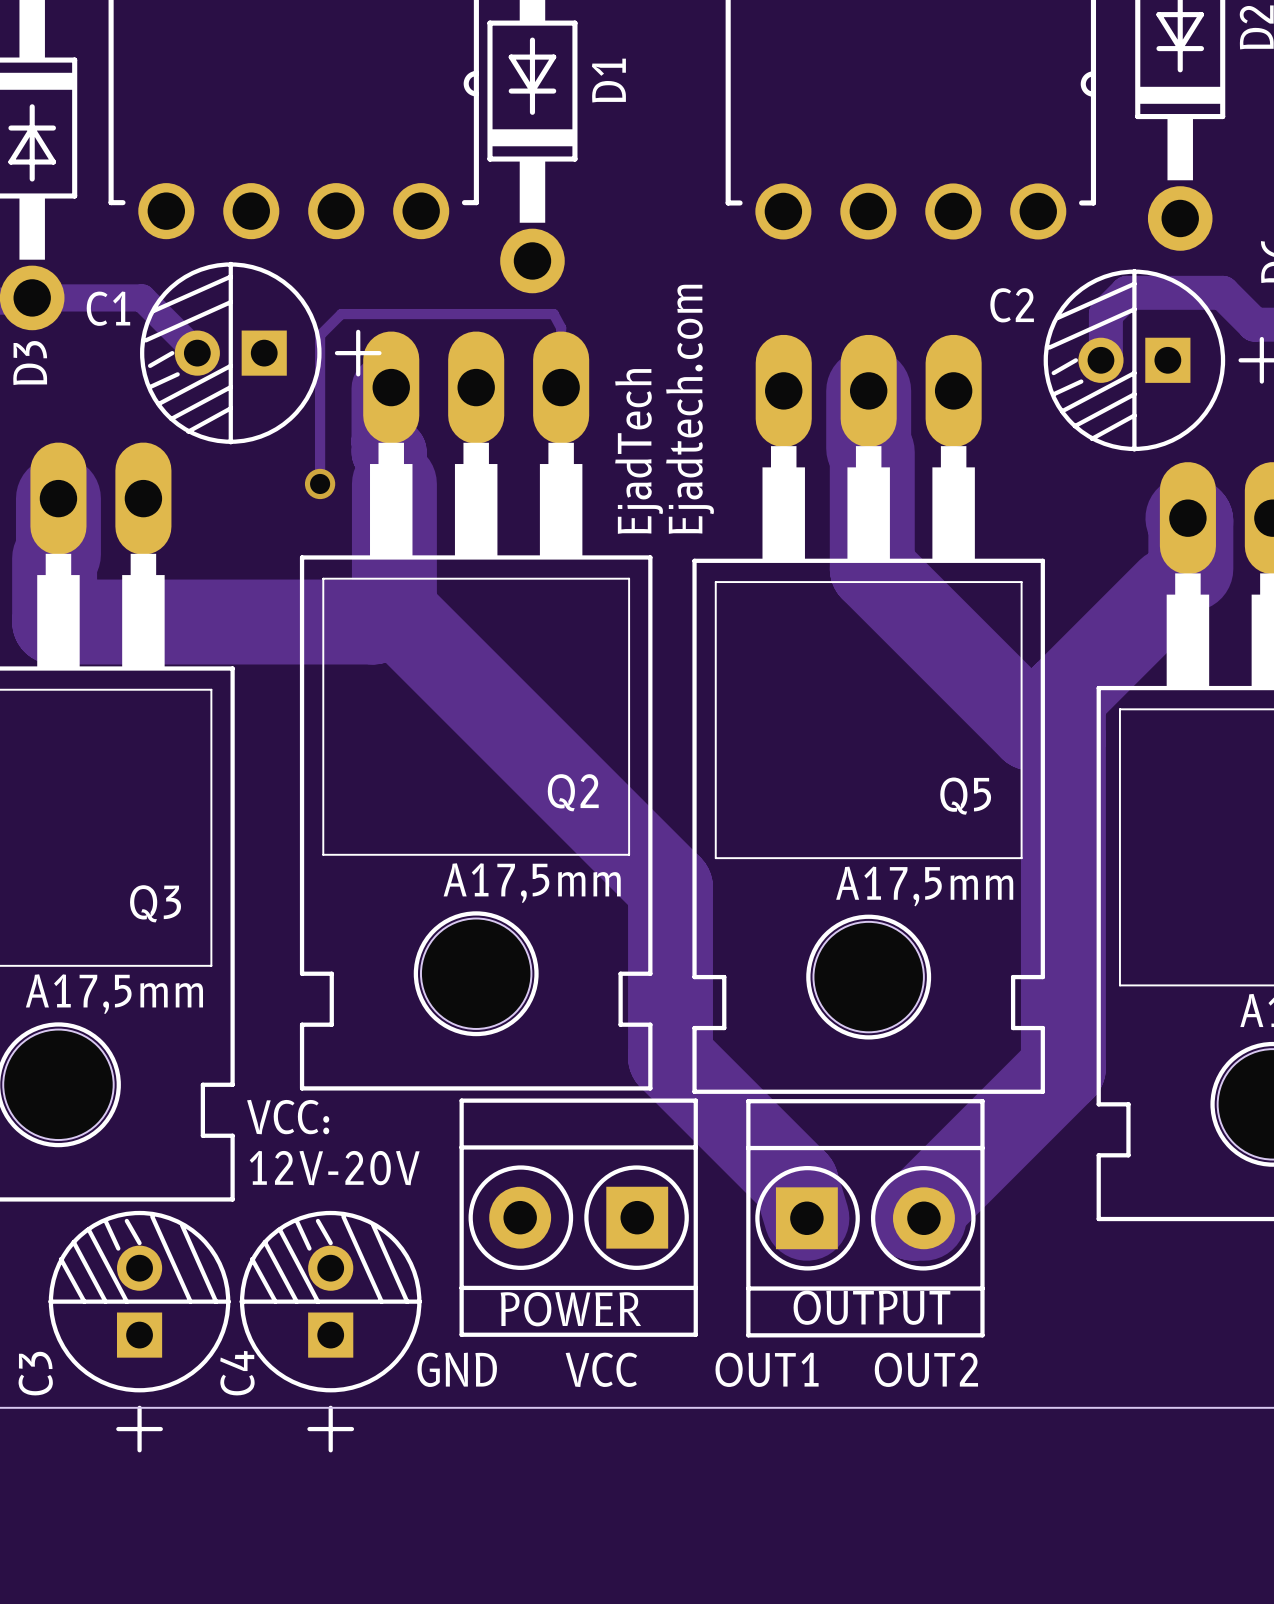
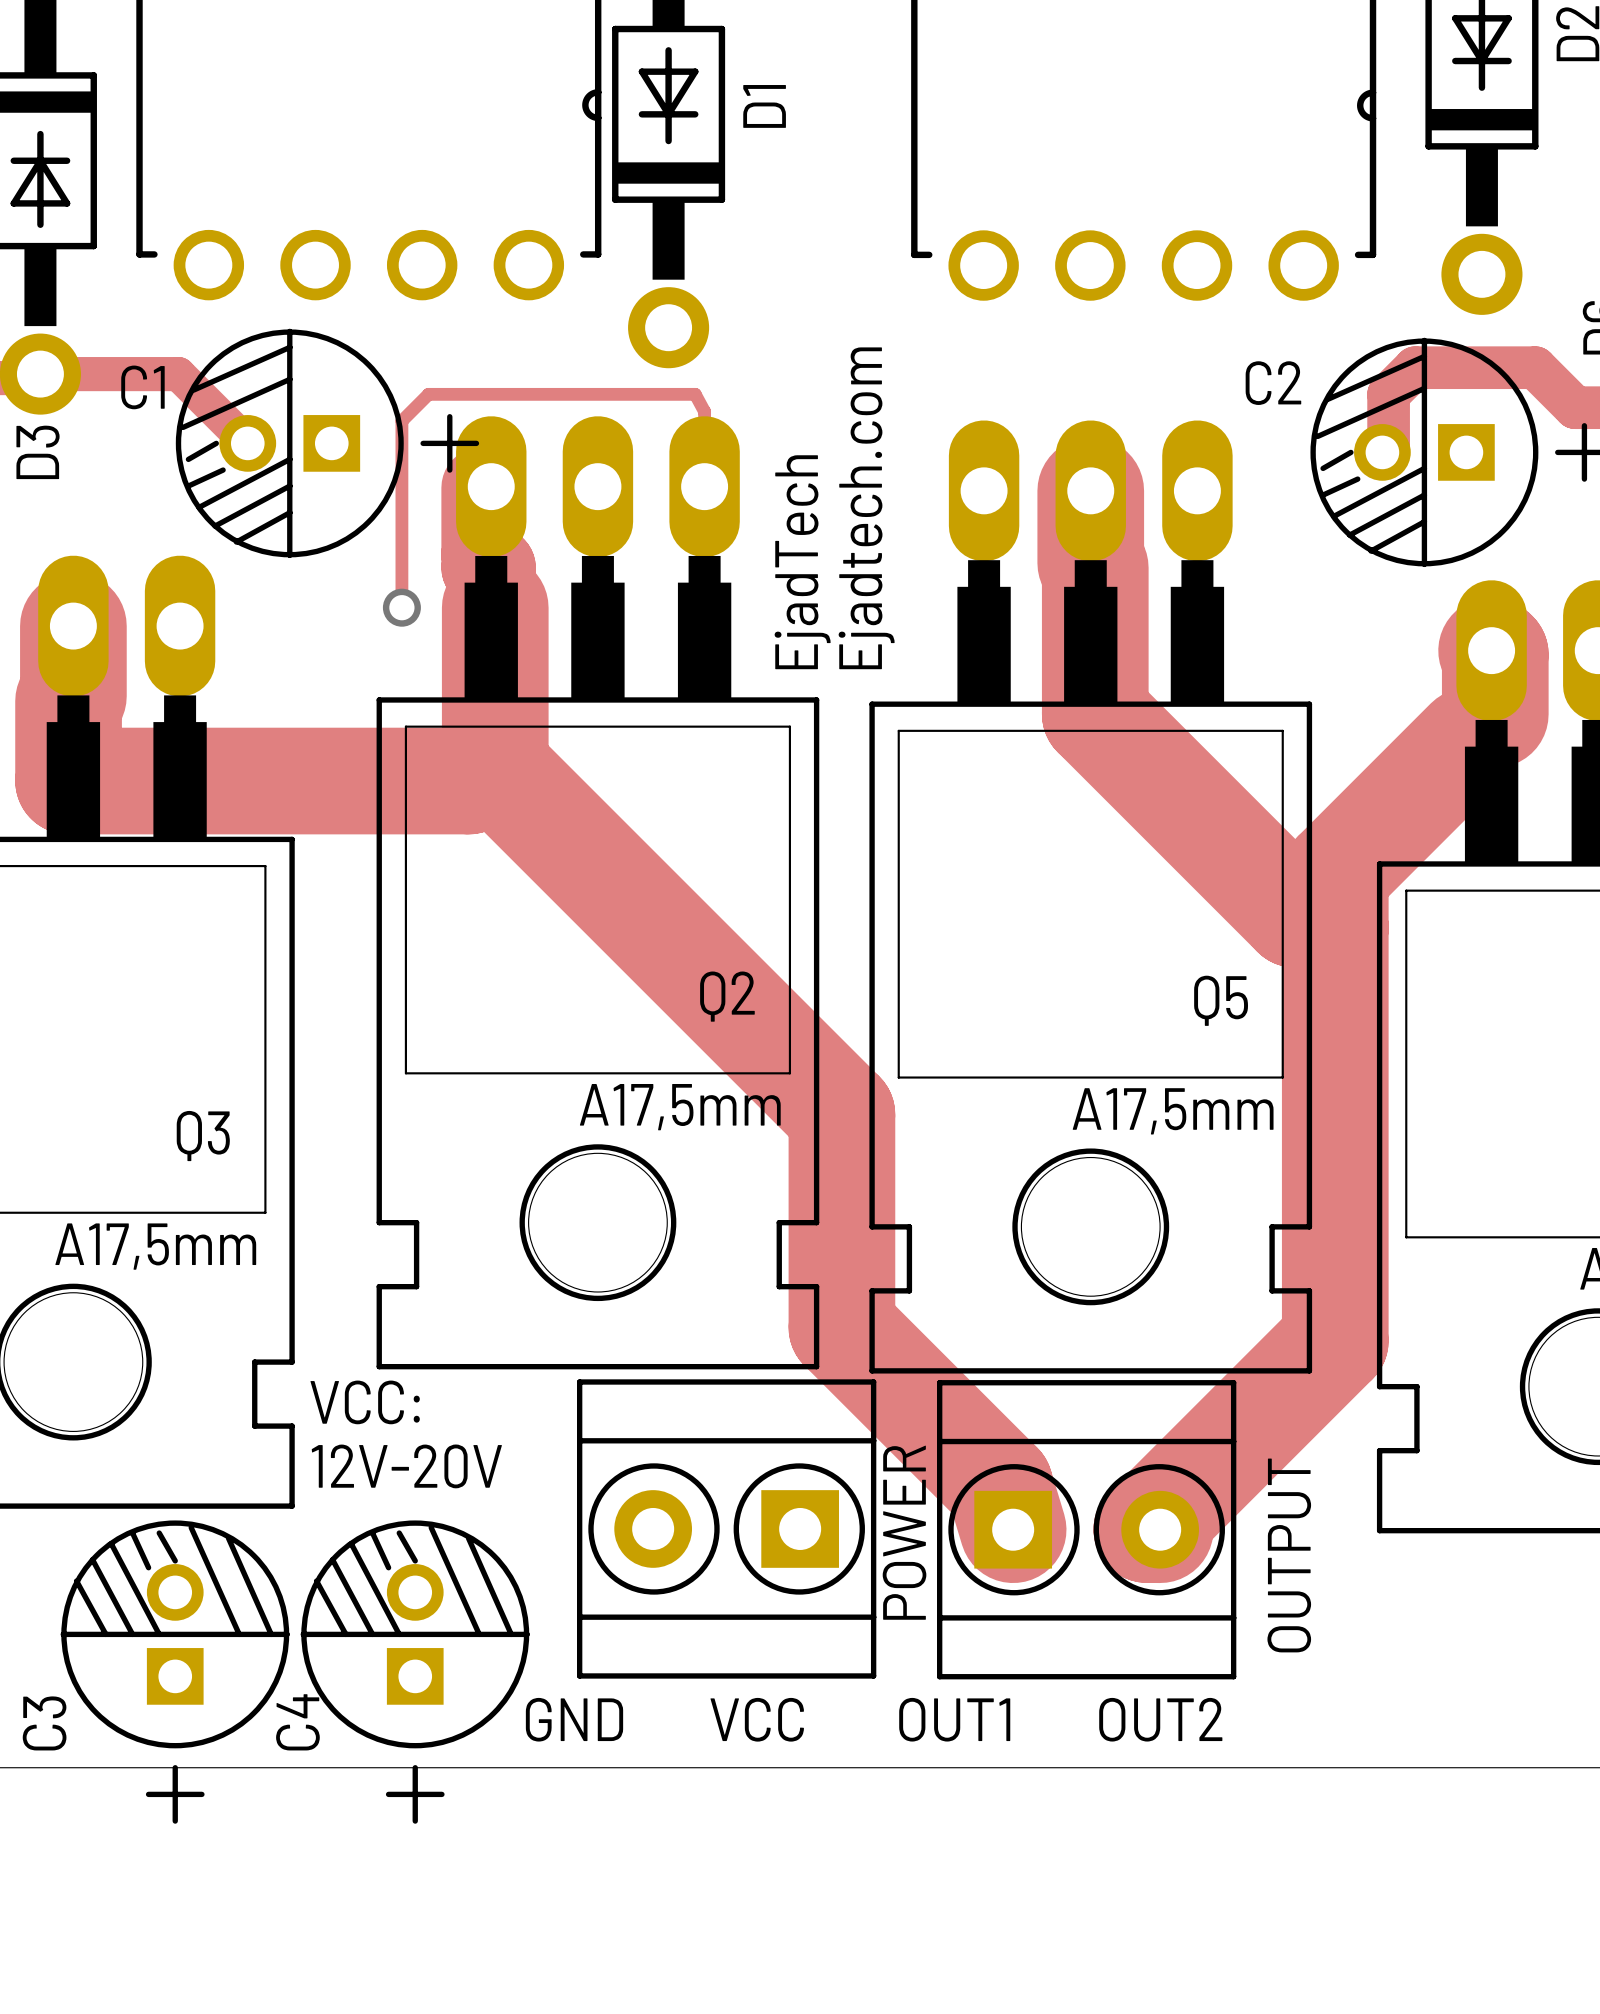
OUTPUT name rotation: 0° (871, 1307) -> 90° counterclockwise (1289, 1555)
POWER name rotation: 0° (570, 1309) -> 90° counterclockwise (904, 1532)

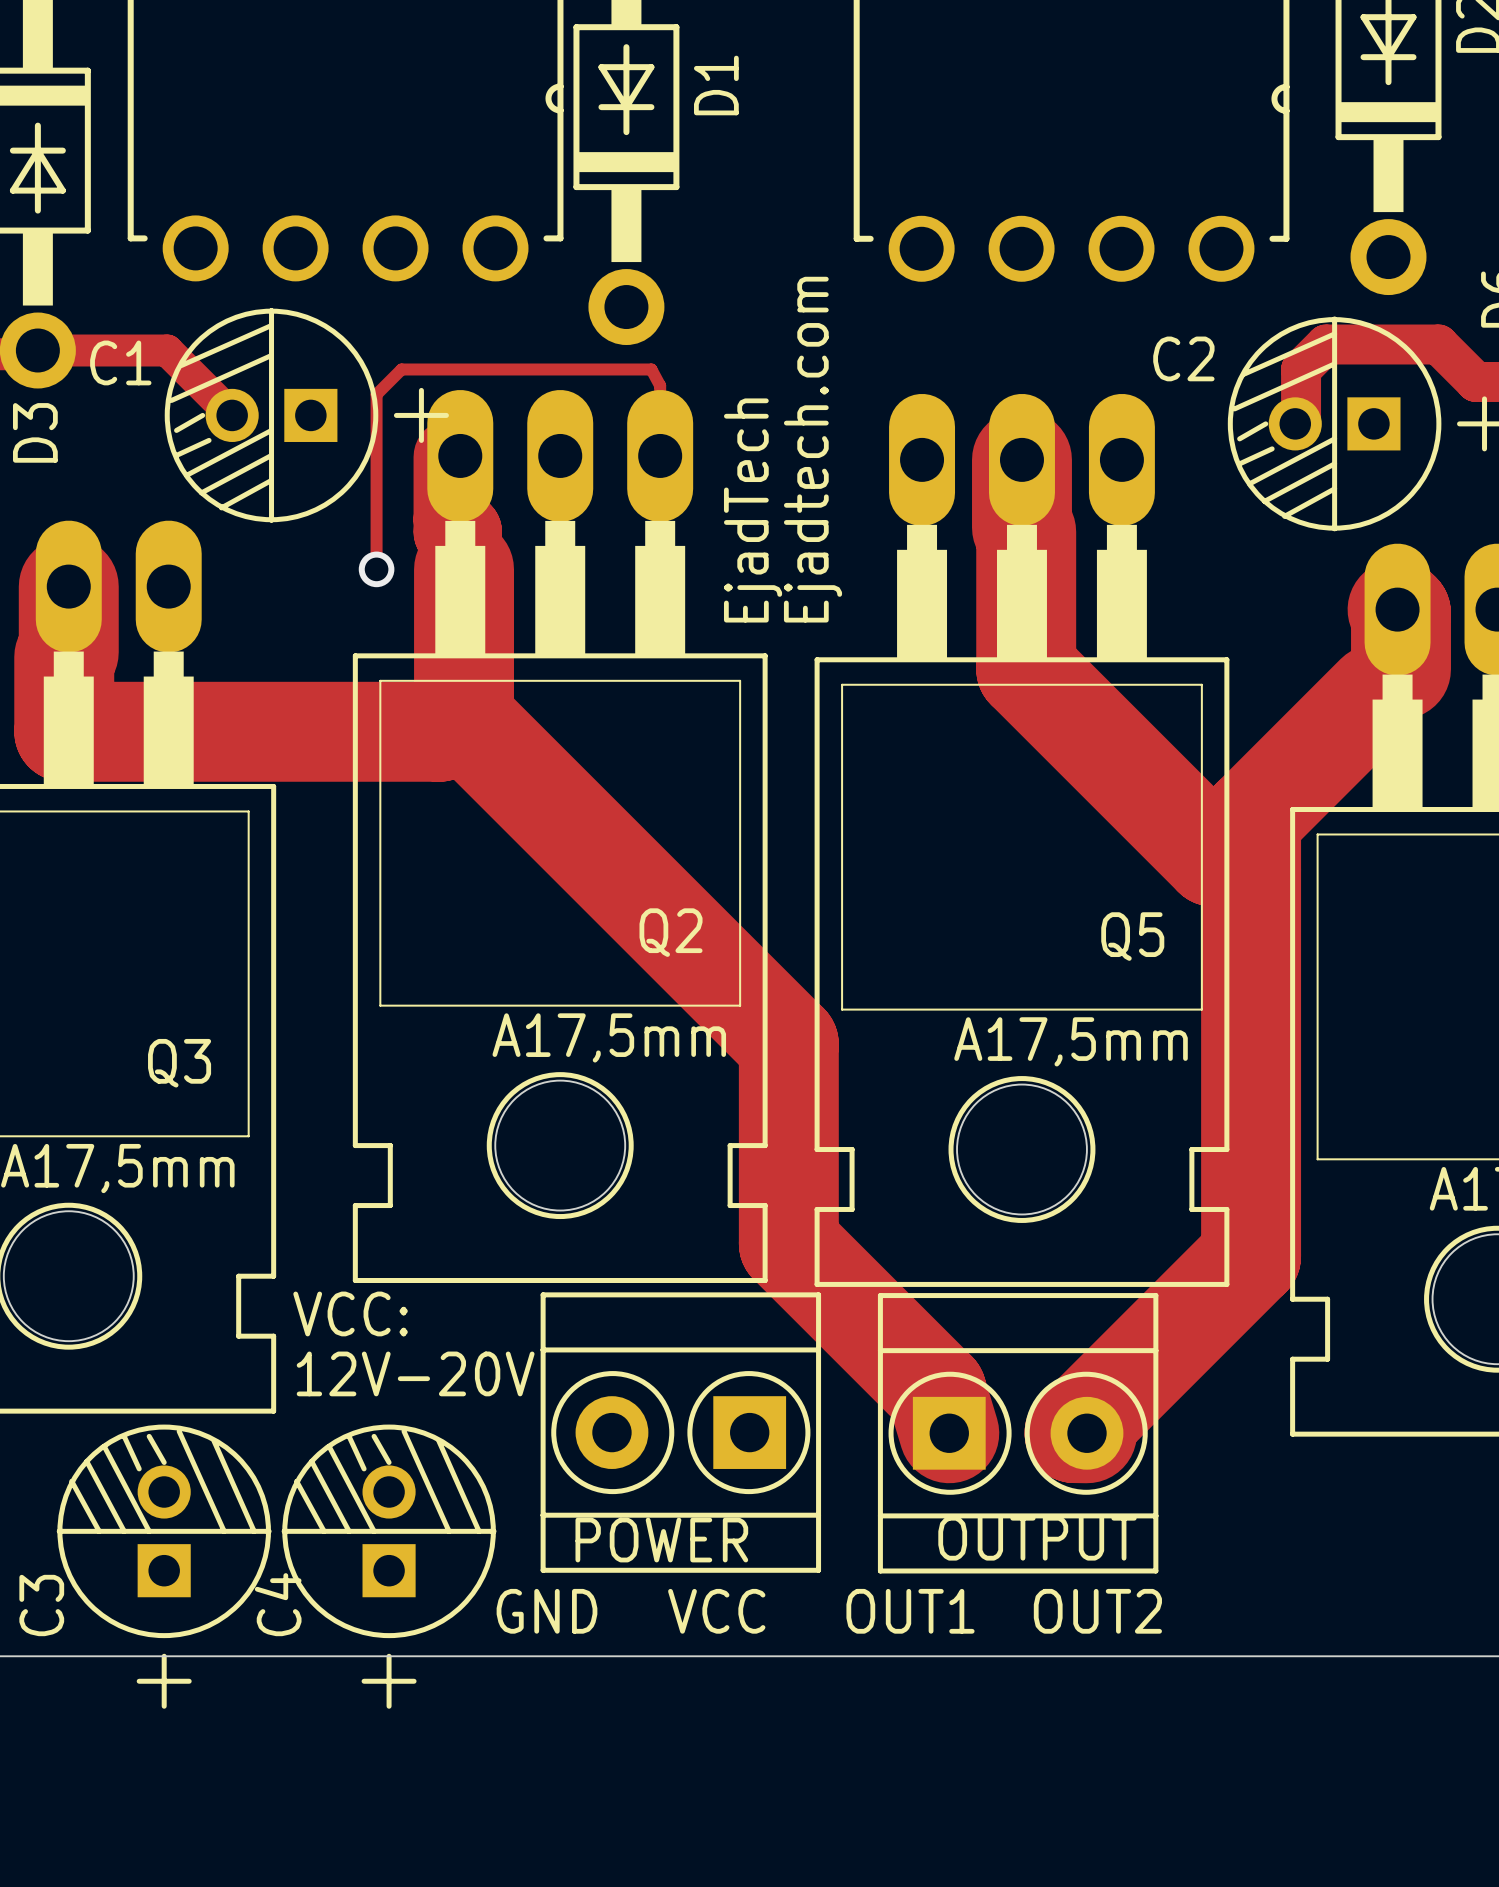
POWER name rotation: 0° (904, 1532) -> 90° clockwise (661, 1540)
OUTPUT name rotation: 0° (1289, 1555) -> 90° clockwise (1037, 1538)

